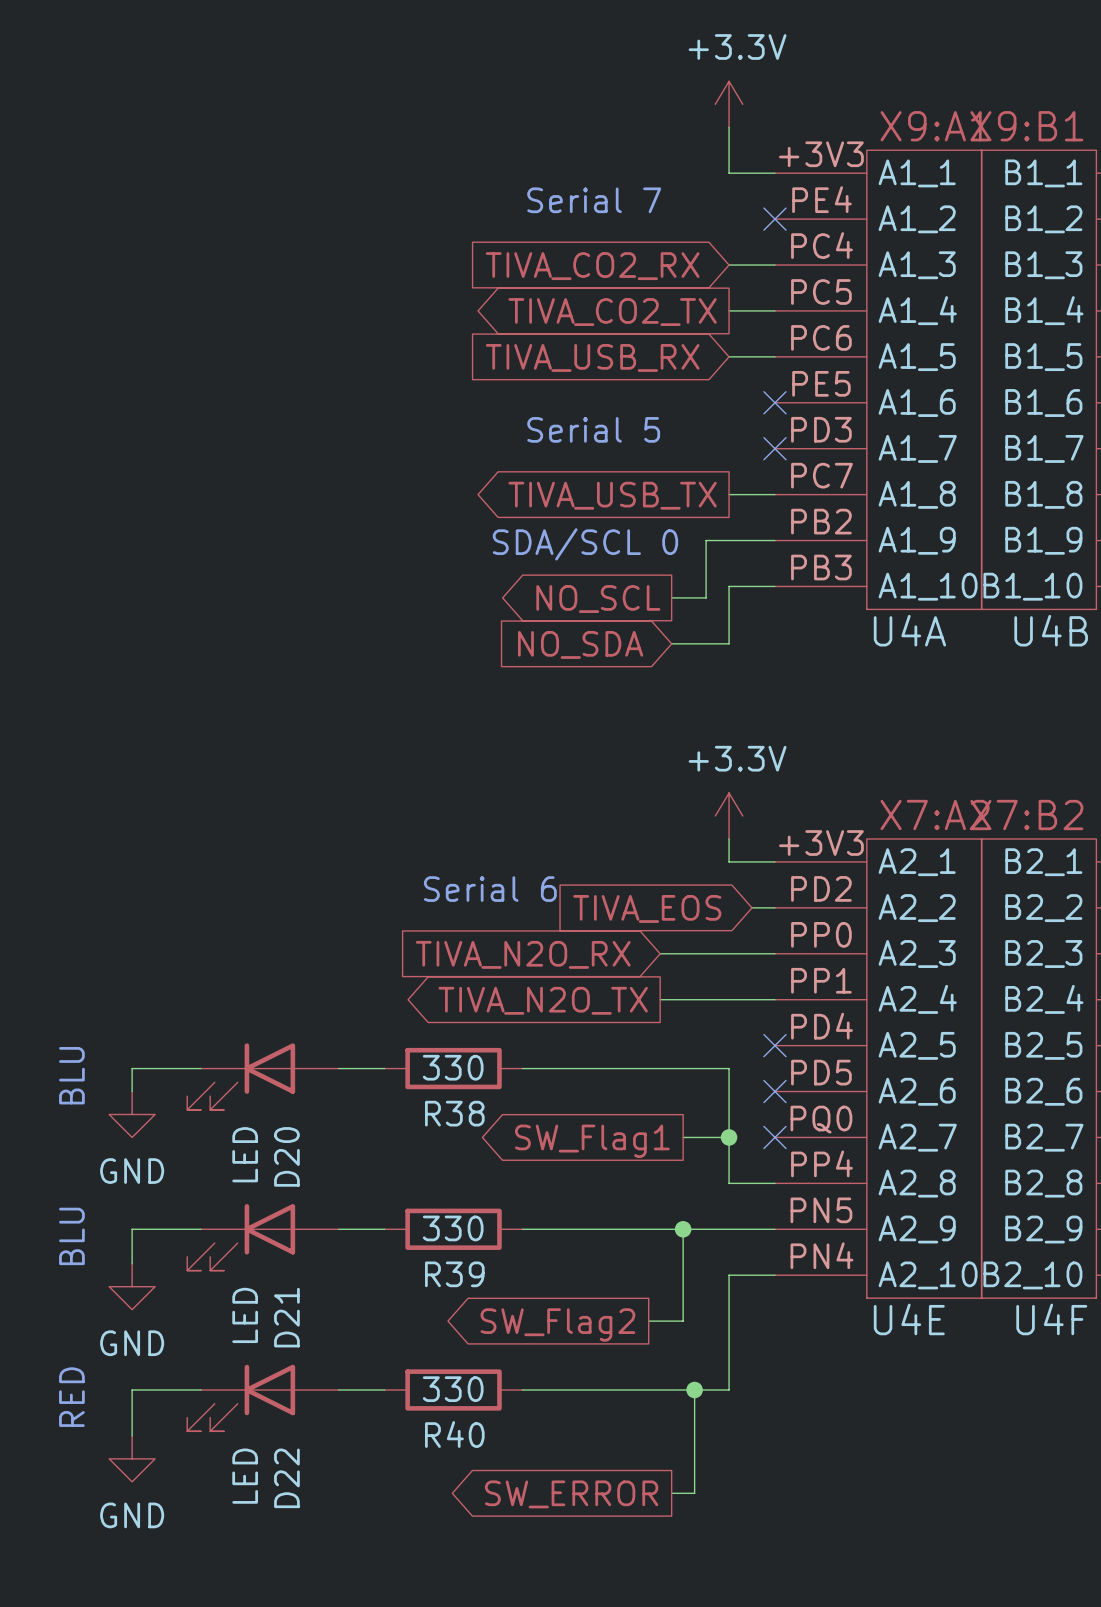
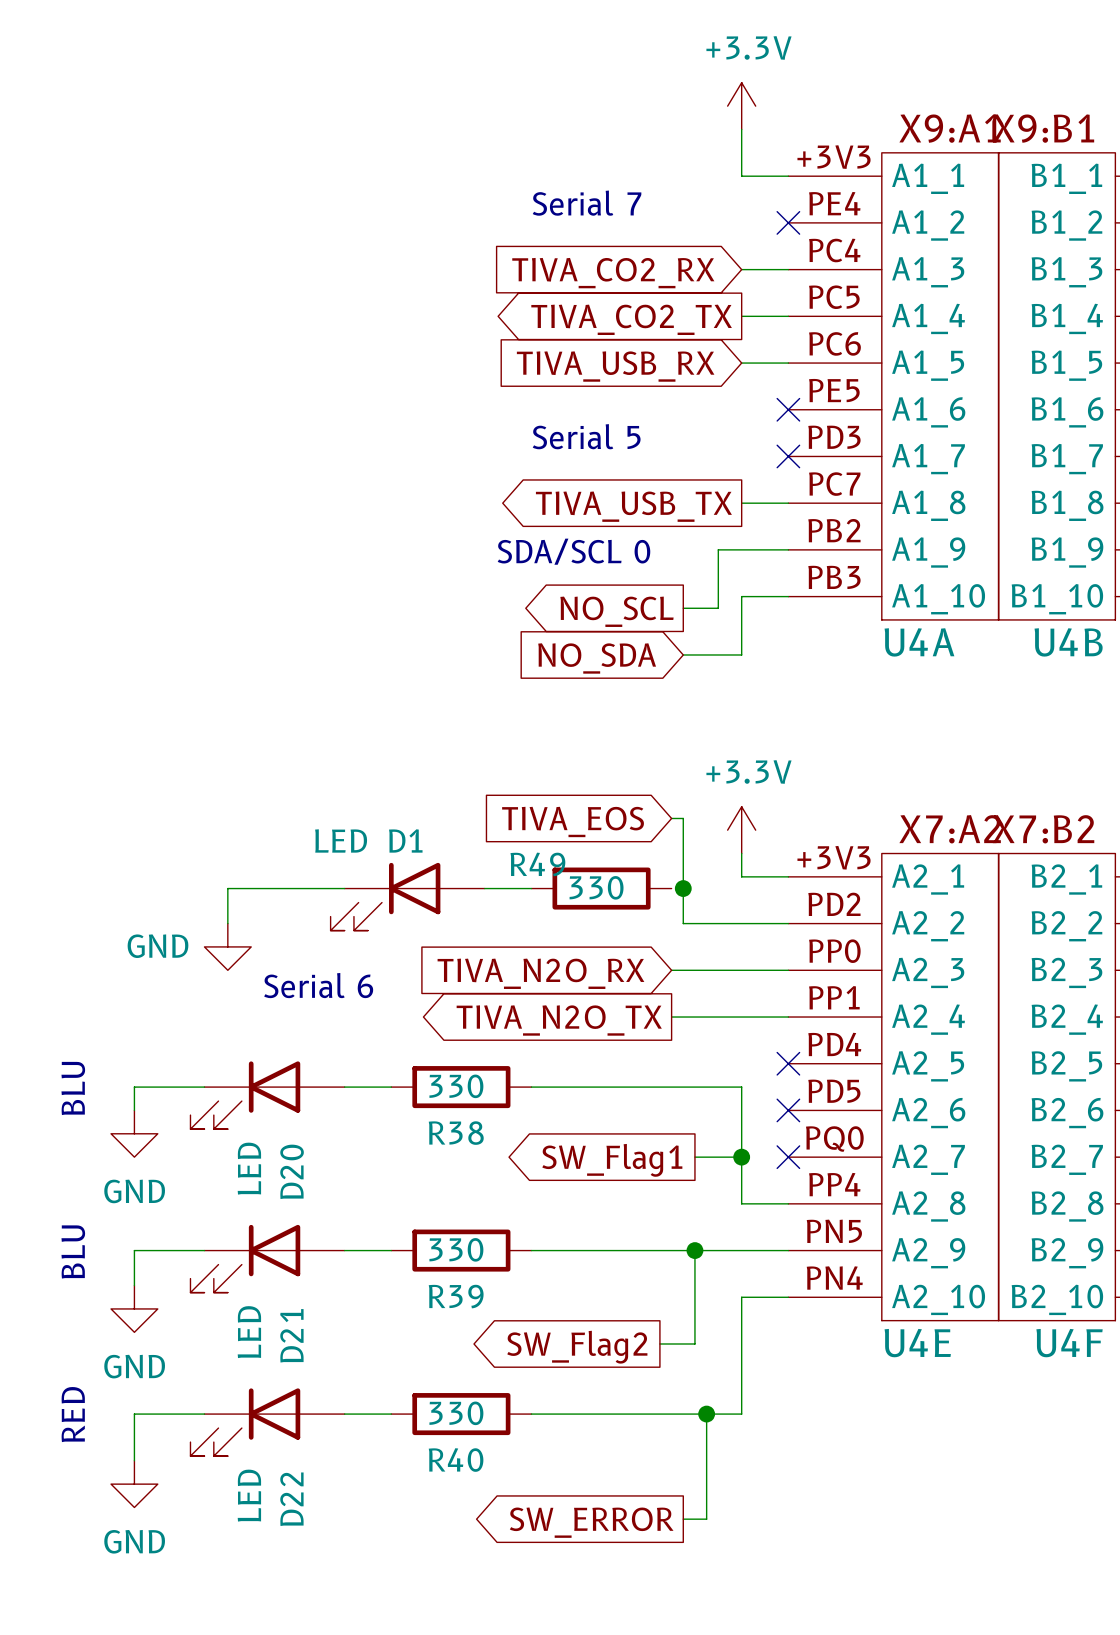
wire: none -> (671, 818) (683, 818) (683, 923) (765, 923)
wire: none -> (344, 888) (227, 888) (227, 923)
wire: none -> (484, 888) (531, 888)
R49: none -> 330 (601, 888)
junction: none -> (683, 888)
D1: none -> LED (407, 896)
text position: Serial 6 (490, 889) -> Serial 6 (318, 985)
global label position: TIVA_EOS (647, 908) -> TIVA_EOS (573, 821)
power symbol: none -> GND (227, 946)

